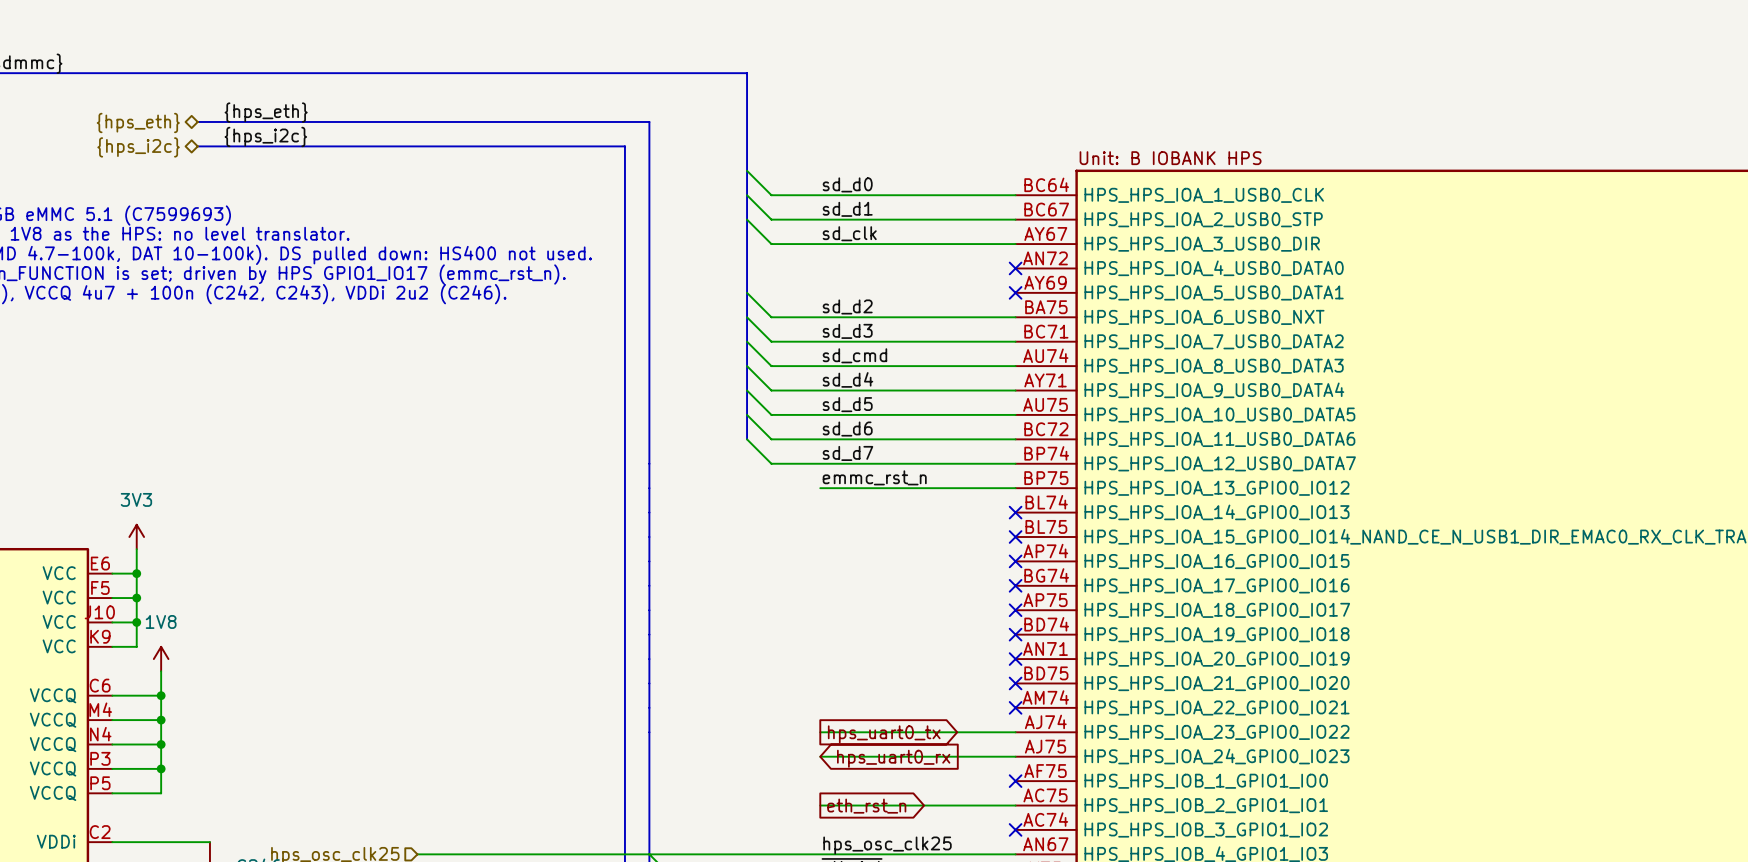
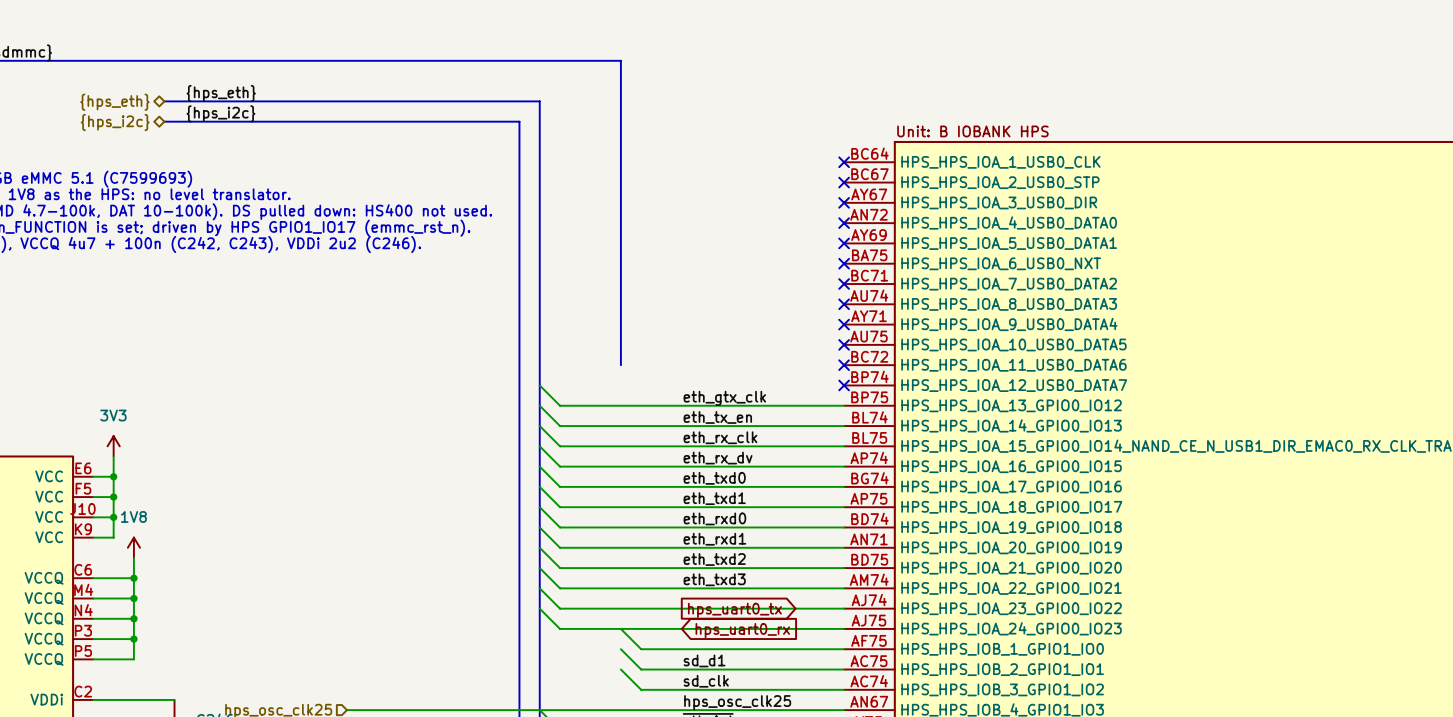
wire: (747, 170) (771, 195) (1015, 195) -> none
label: sd_d0 (847, 184) -> none
wire: (747, 195) (771, 219) (1015, 219) -> none
no-connect mark: none -> (844, 162)
label: sd_d1 (847, 209) -> none
wire: (747, 219) (771, 244) (1015, 244) -> none
no-connect mark: none -> (844, 182)
label: sd_clk (849, 233) -> none
no-connect mark: none -> (844, 202)
wire: (747, 292) (771, 317) (1015, 317) -> none
label: sd_d2 (847, 306) -> none
wire: (747, 317) (771, 341) (1015, 341) -> none
no-connect mark: none -> (844, 263)
label: sd_d3 (847, 331) -> none
wire: (747, 341) (771, 366) (1015, 366) -> none
no-connect mark: none -> (844, 284)
label: sd_cmd (854, 355) -> none
wire: (747, 366) (771, 390) (1015, 390) -> none
no-connect mark: none -> (844, 304)
label: sd_d4 (847, 379) -> none
wire: (747, 390) (771, 414) (1015, 414) -> none
no-connect mark: none -> (844, 324)
label: sd_d5 (847, 404) -> none
wire: (747, 414) (771, 439) (1015, 439) -> none
no-connect mark: none -> (844, 344)
label: sd_d6 (847, 429) -> none
wire: (747, 439) (771, 463) (1015, 463) -> none
no-connect mark: none -> (844, 365)
label: sd_d7 (847, 453) -> none
wire: none -> (539, 385) (560, 405) (681, 405)
no-connect mark: none -> (844, 385)
label: emmc_rst_n (874, 477) -> eth_gtx_clk (724, 398)
wire: none -> (539, 405) (560, 426) (844, 426)
label: none -> eth_tx_en (717, 417)
wire: none -> (539, 426) (560, 446) (844, 446)
no-connect mark: (1015, 512) -> none
label: none -> eth_rx_clk (720, 437)
wire: none -> (539, 446) (560, 466) (844, 466)
no-connect mark: (1015, 536) -> none
label: none -> eth_rx_dv (718, 458)
wire: none -> (539, 466) (560, 486) (844, 486)
no-connect mark: (1015, 561) -> none
label: none -> eth_txd0 (714, 478)
wire: none -> (539, 486) (560, 507) (844, 507)
no-connect mark: (1015, 585) -> none
label: none -> eth_txd1 (714, 498)
wire: none -> (539, 507) (560, 527) (844, 527)
no-connect mark: (1015, 610) -> none
label: none -> eth_rxd0 (714, 518)
wire: none -> (539, 527) (560, 547) (844, 547)
no-connect mark: (1015, 634) -> none
label: none -> eth_rxd1 (714, 539)
wire: none -> (539, 547) (560, 568) (844, 568)
no-connect mark: (1015, 659) -> none
label: none -> eth_txd2 (714, 559)
wire: none -> (539, 568) (560, 588) (844, 588)
no-connect mark: (1015, 683) -> none
label: none -> eth_txd3 (714, 579)
wire: none -> (539, 588) (560, 608) (681, 608)
no-connect mark: (1015, 707) -> none
wire: none -> (539, 608) (560, 628) (681, 628)
wire: none -> (620, 628) (641, 649) (844, 649)
wire: none -> (620, 649) (641, 669) (681, 669)
no-connect mark: (1015, 781) -> none
label: none -> sd_d1 (704, 660)
wire: none -> (620, 669) (641, 689) (844, 689)
global label: eth_rst_n (866, 806) -> none
label: none -> sd_clk (706, 681)
no-connect mark: (1015, 829) -> none

